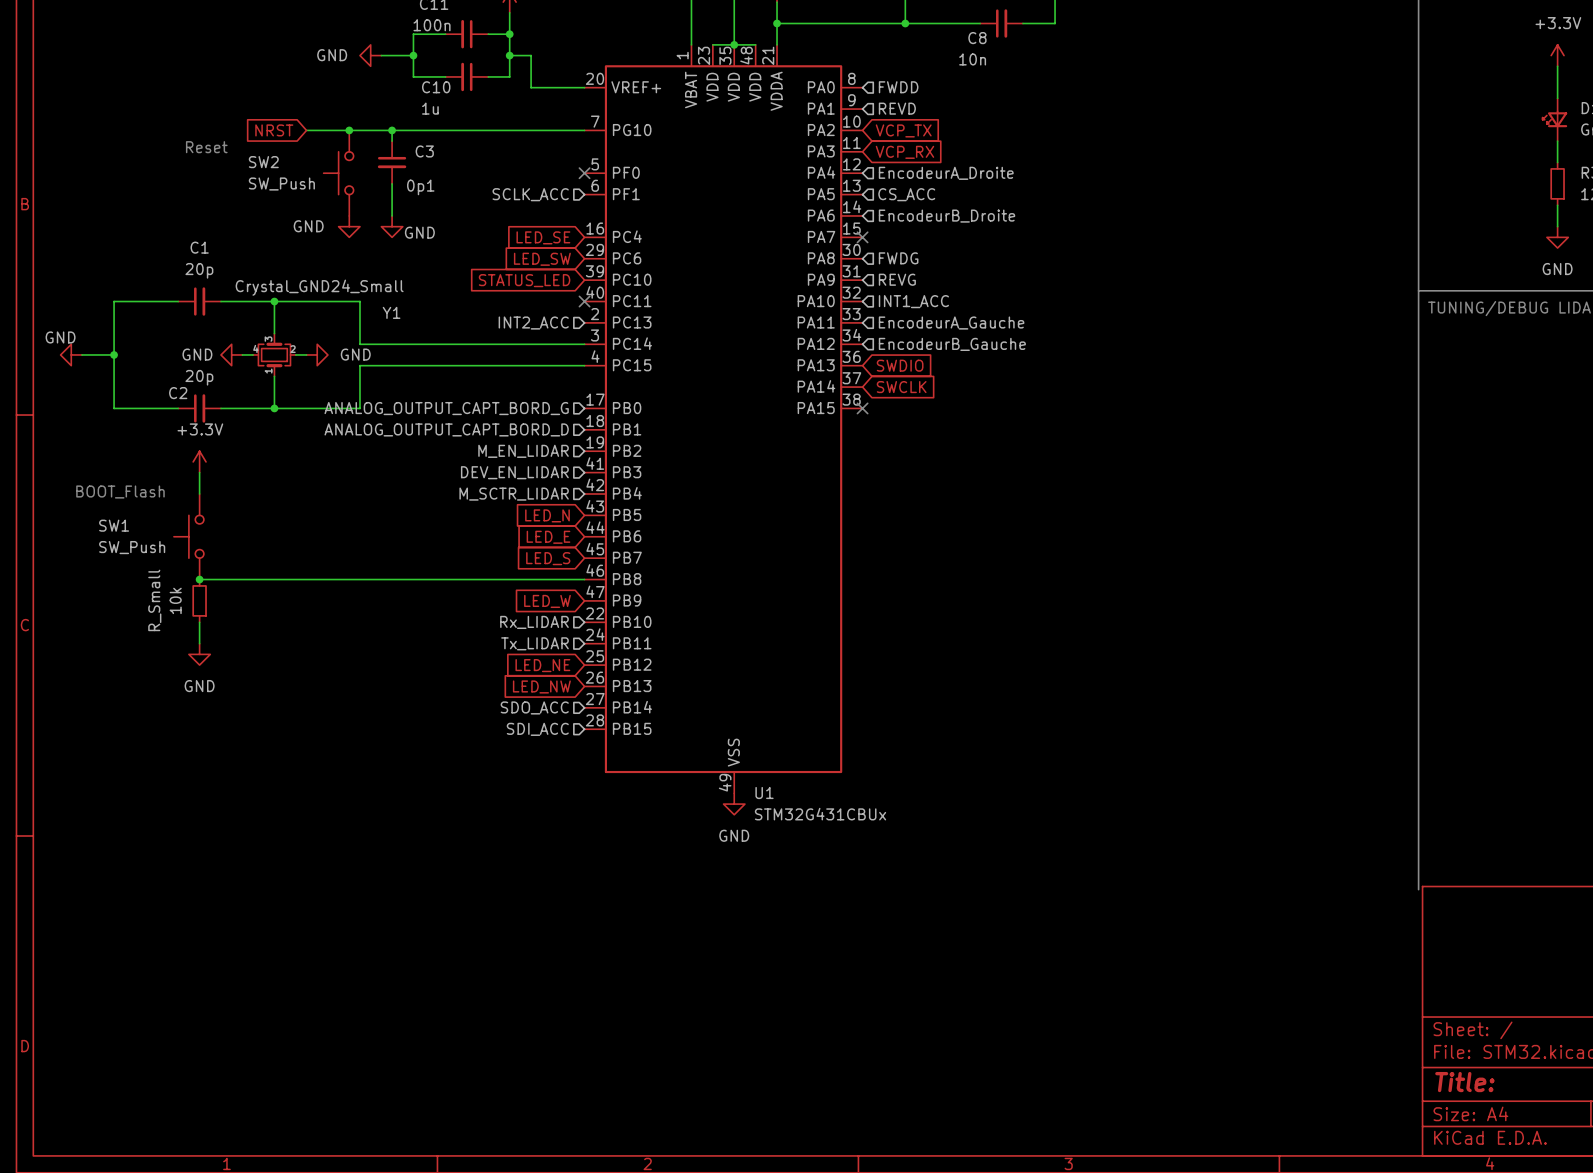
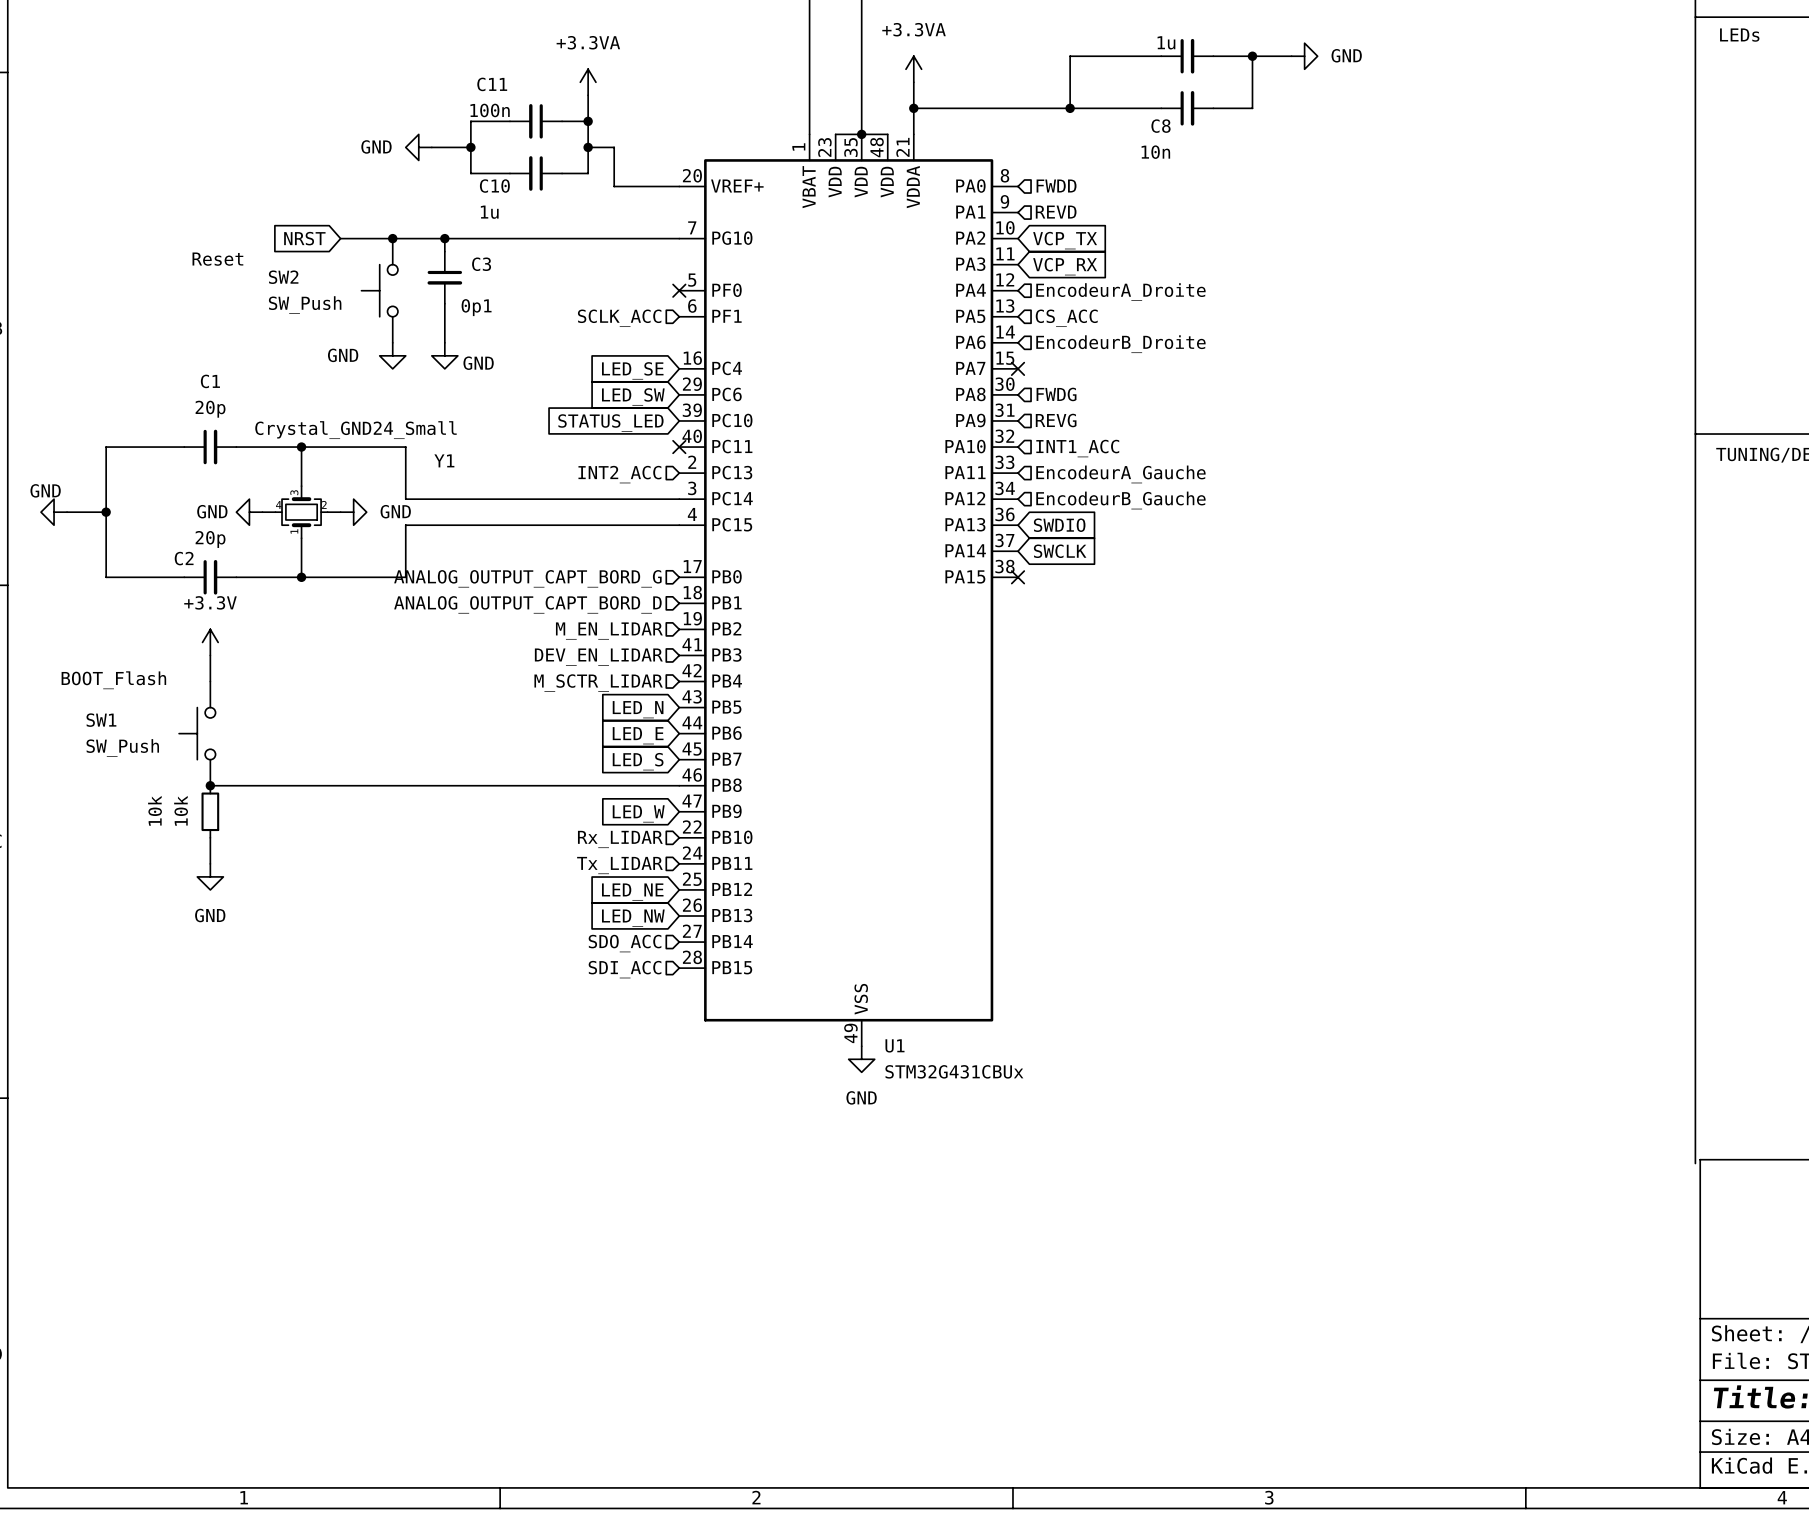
10k value: R_Small (154, 600) -> 10k (155, 810)

